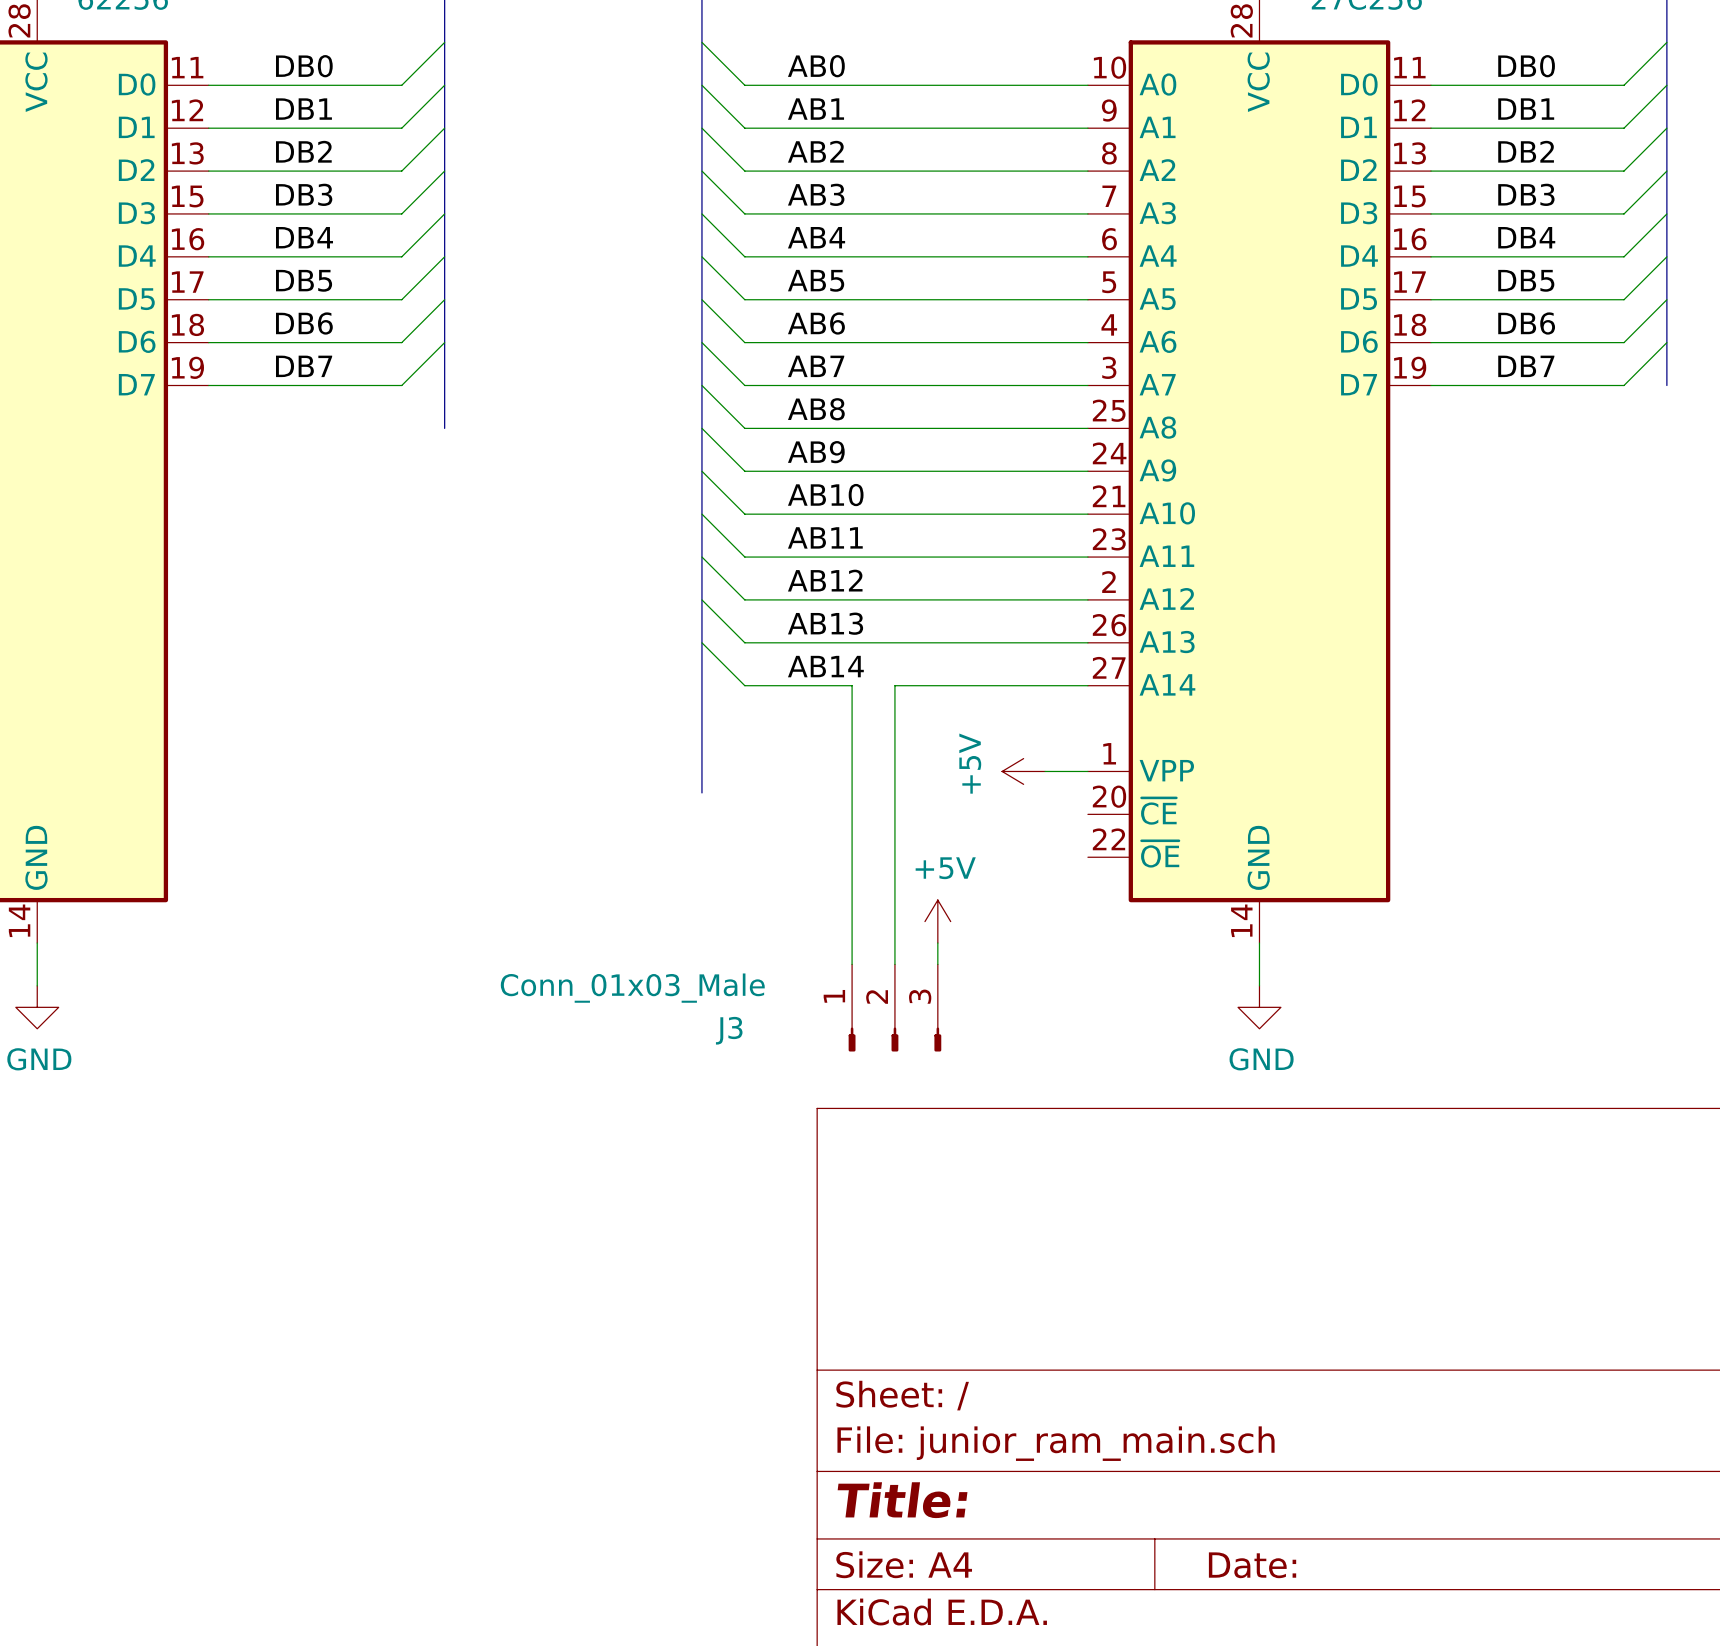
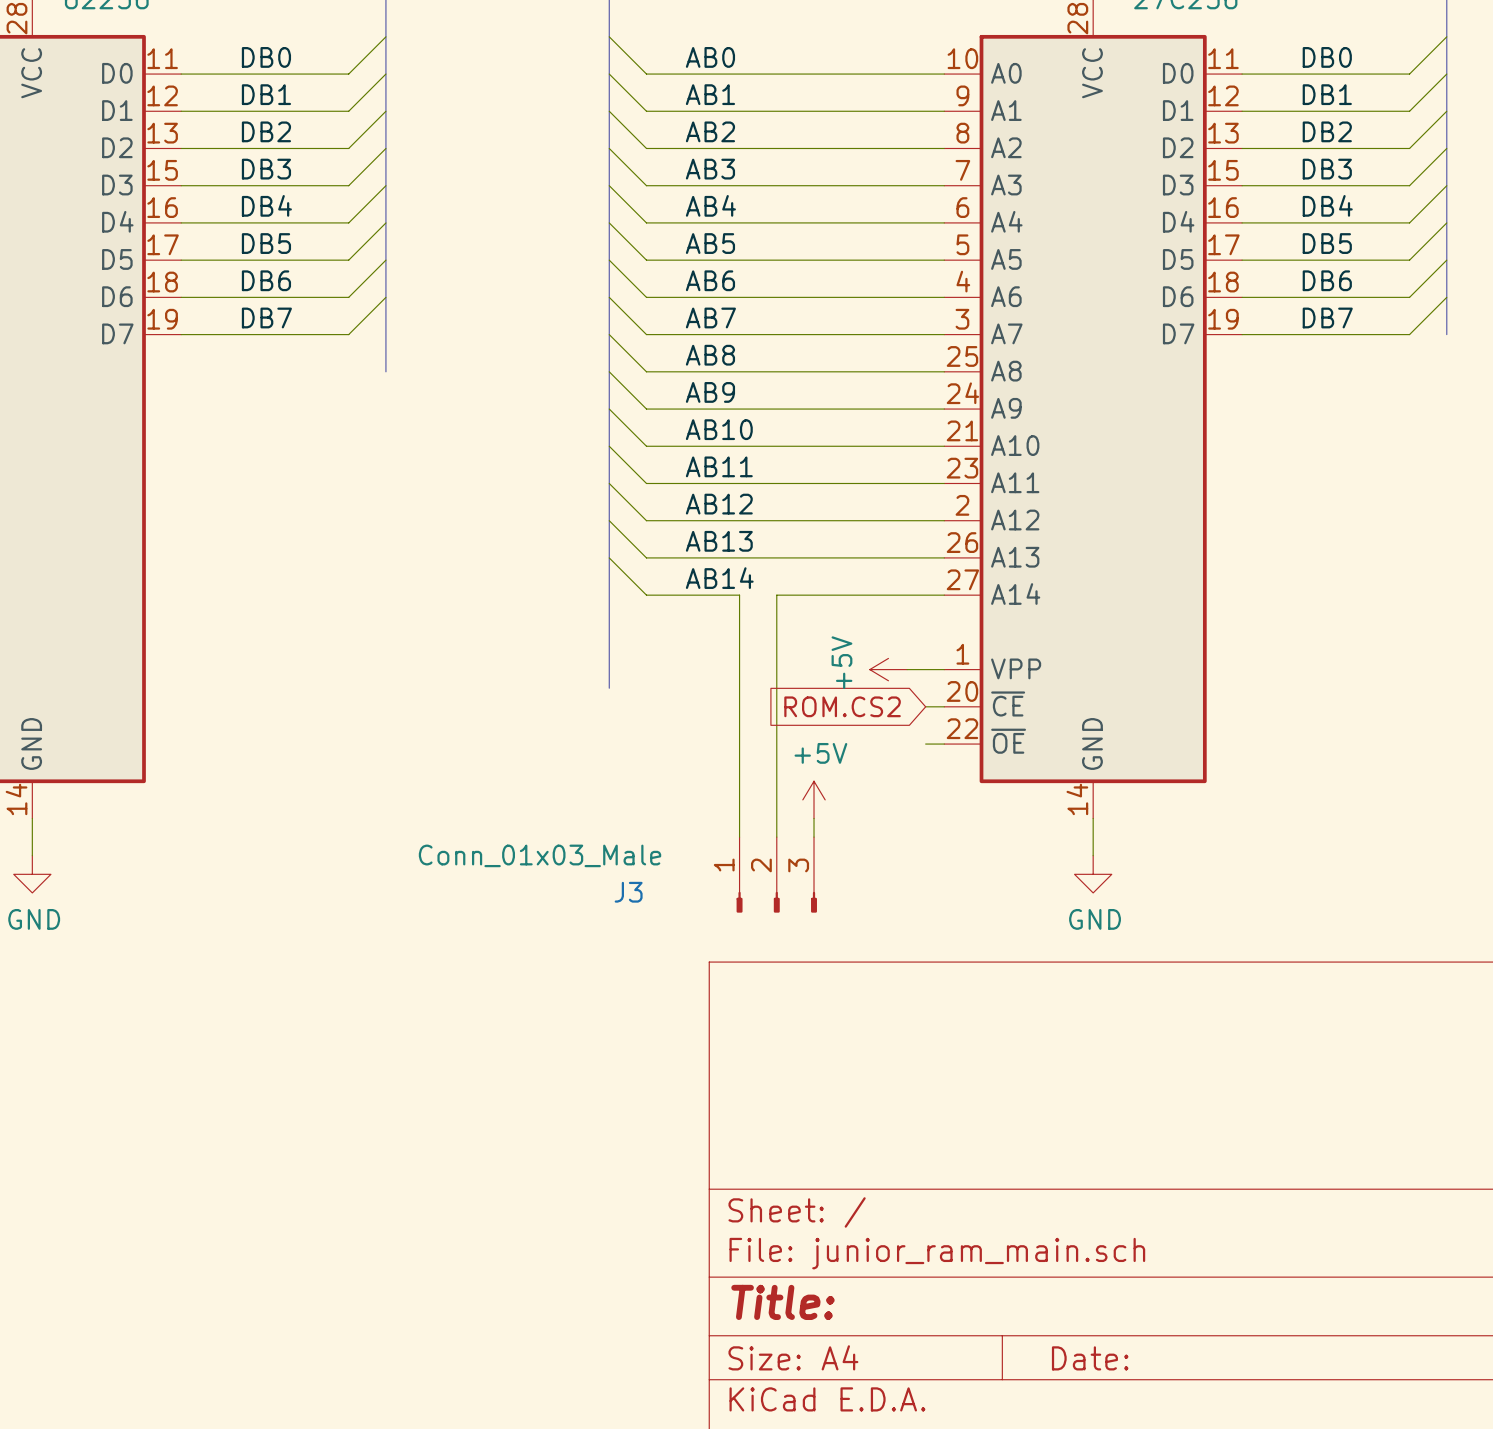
global label: none -> ROM.CS2 (842, 706)
wire: none -> (925, 706) (944, 706)
wire: none -> (925, 744) (944, 744)

